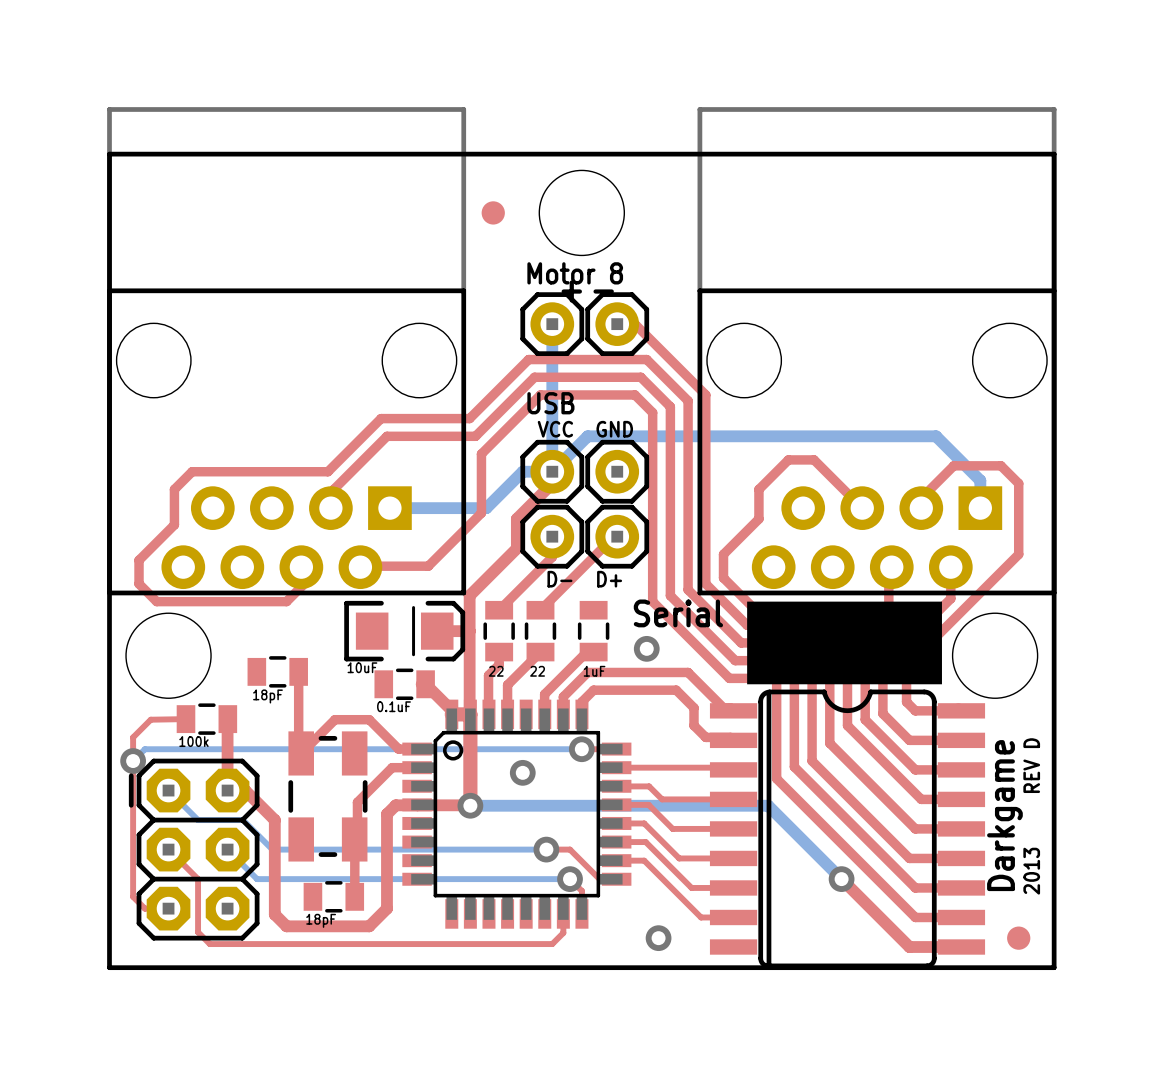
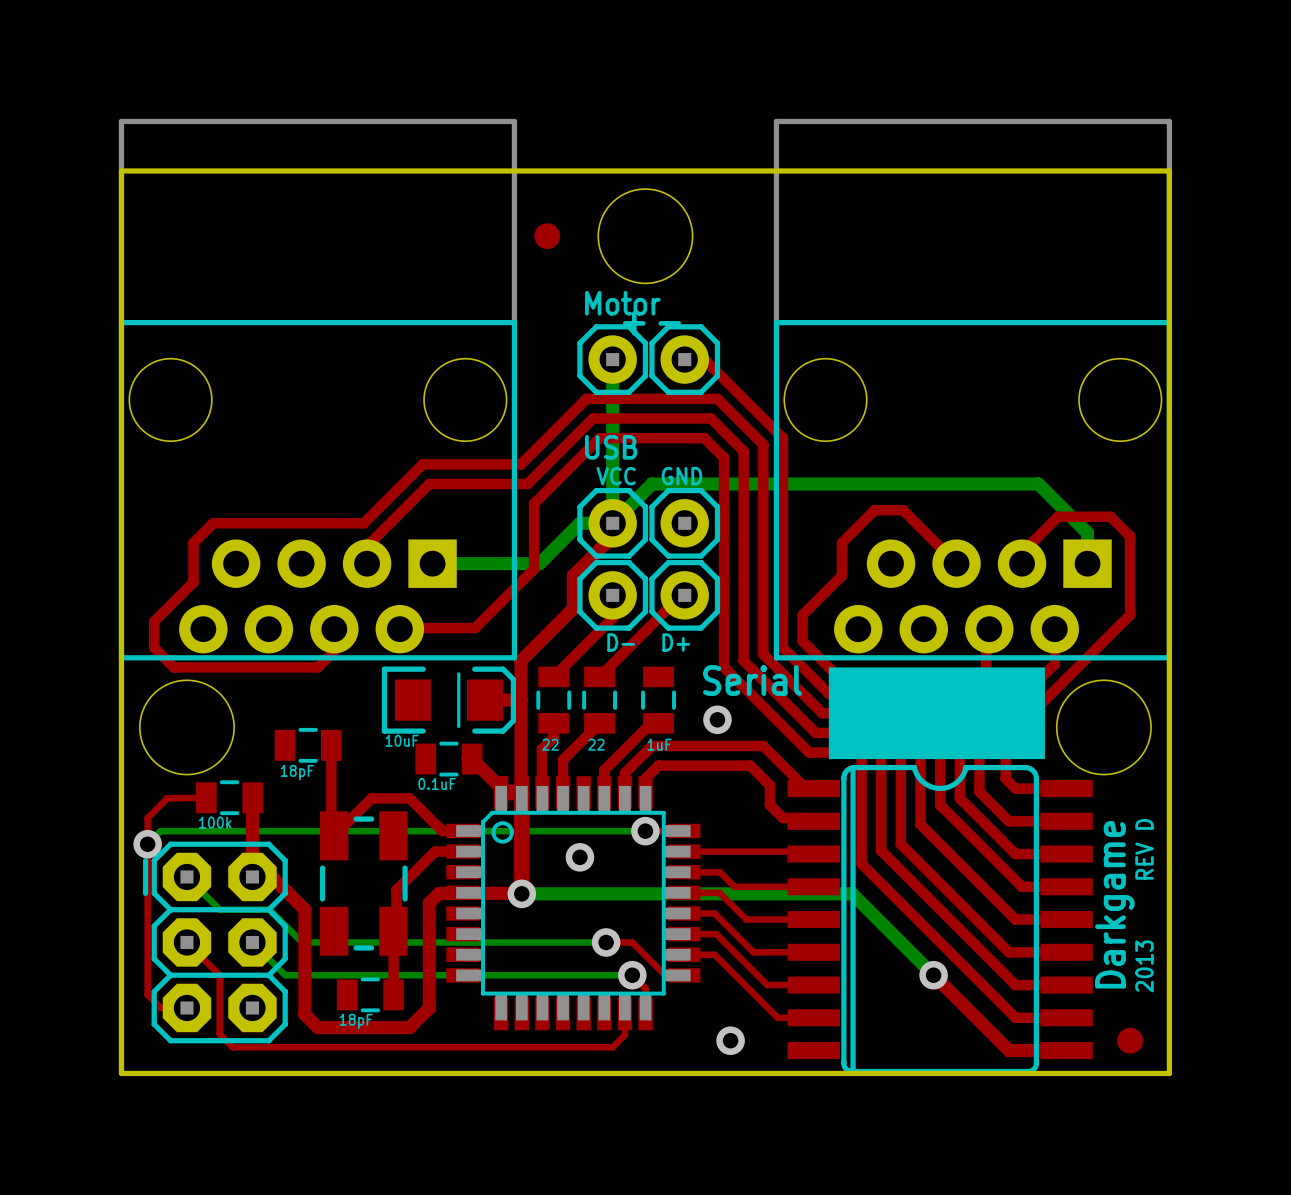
text: Motor 8 (575, 273) -> Motor (622, 303)

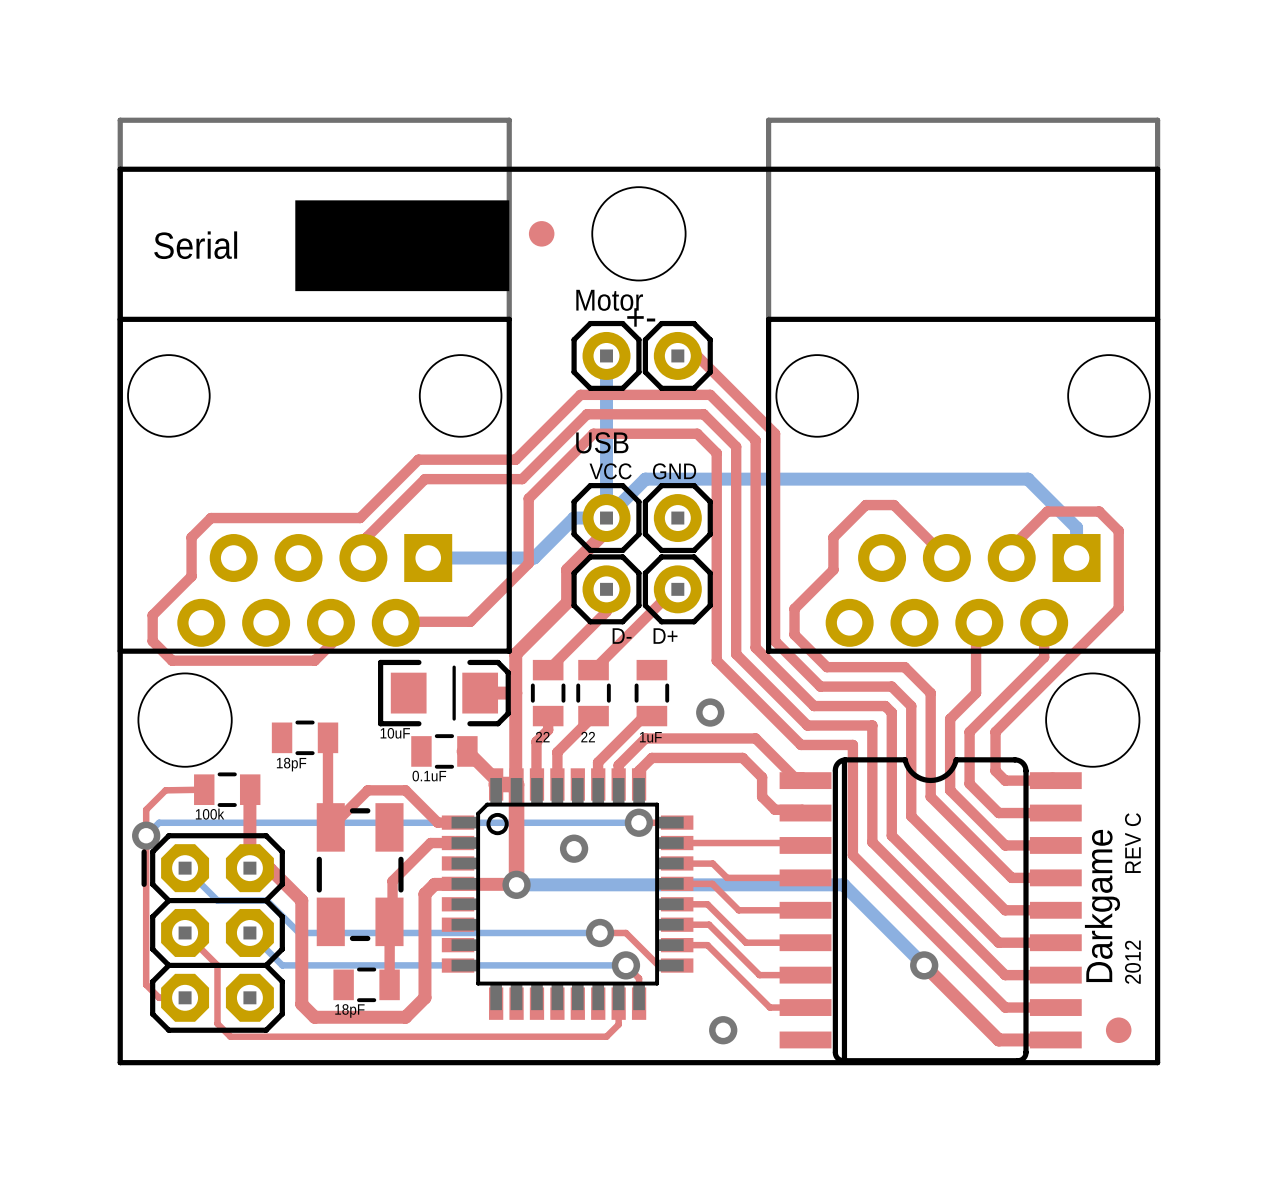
drawing: none -> [295, 200, 510, 292]
text: none -> Serial (195, 245)
drawing: [828, 667, 1045, 760] -> none
text: Serial (752, 680) -> none
text: REV D (1144, 849) -> REV C (1132, 843)
text: 2013 (1144, 966) -> 2012 (1132, 962)

